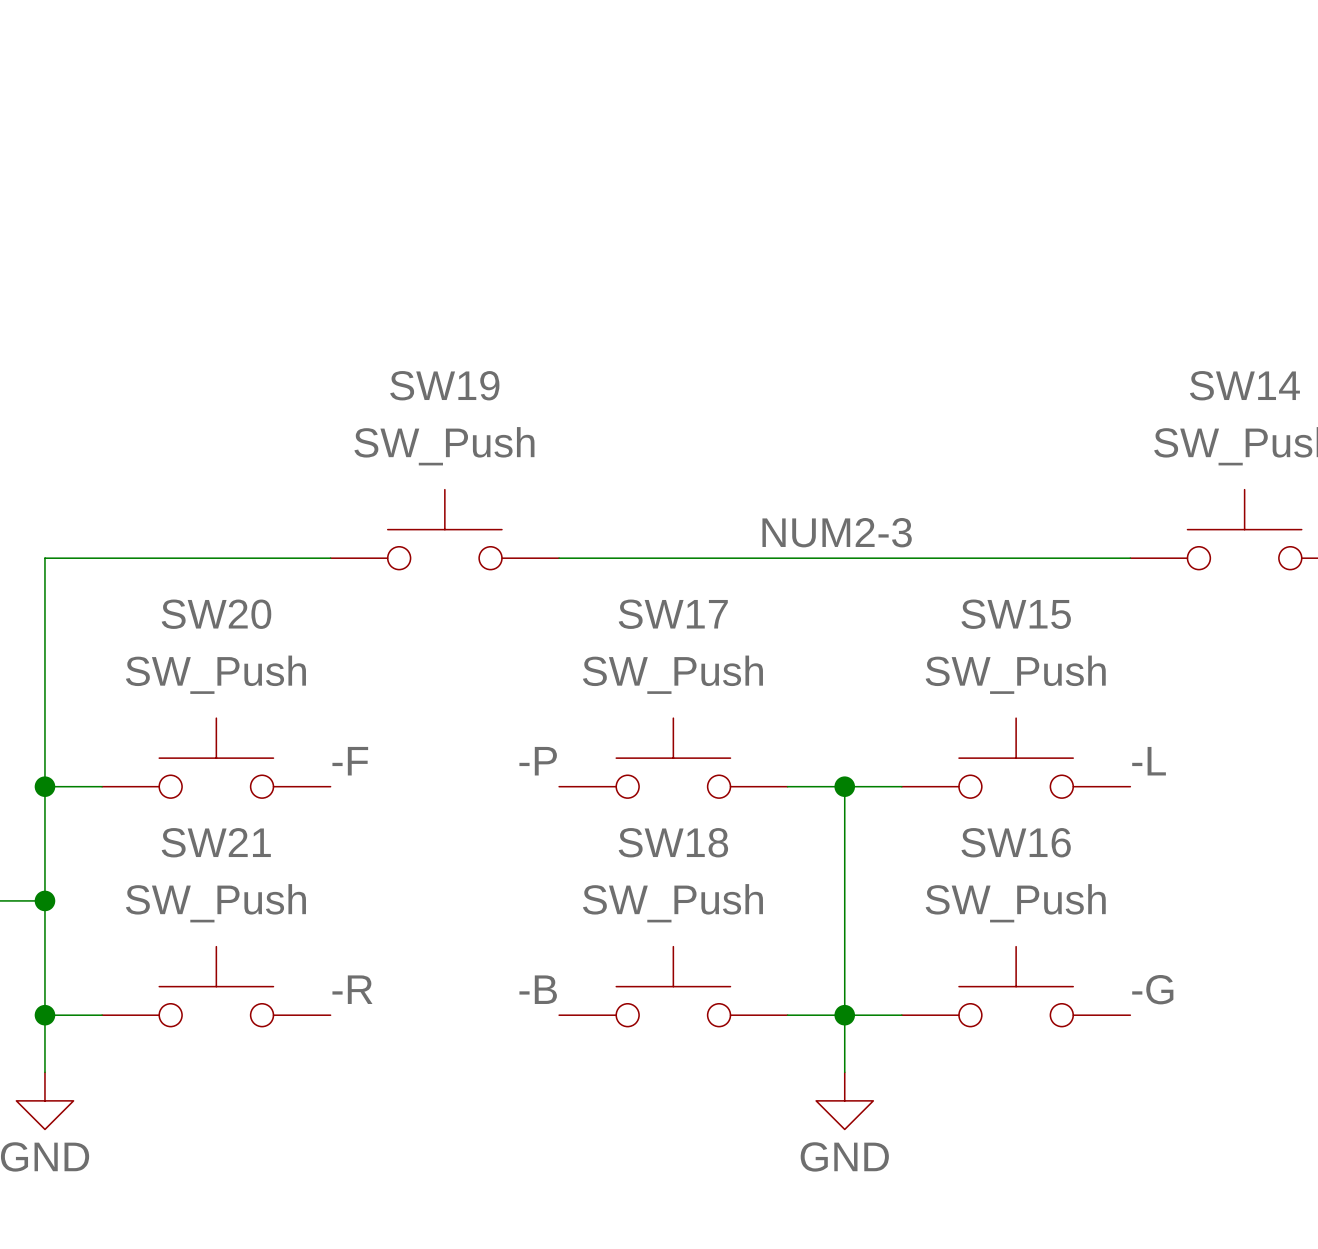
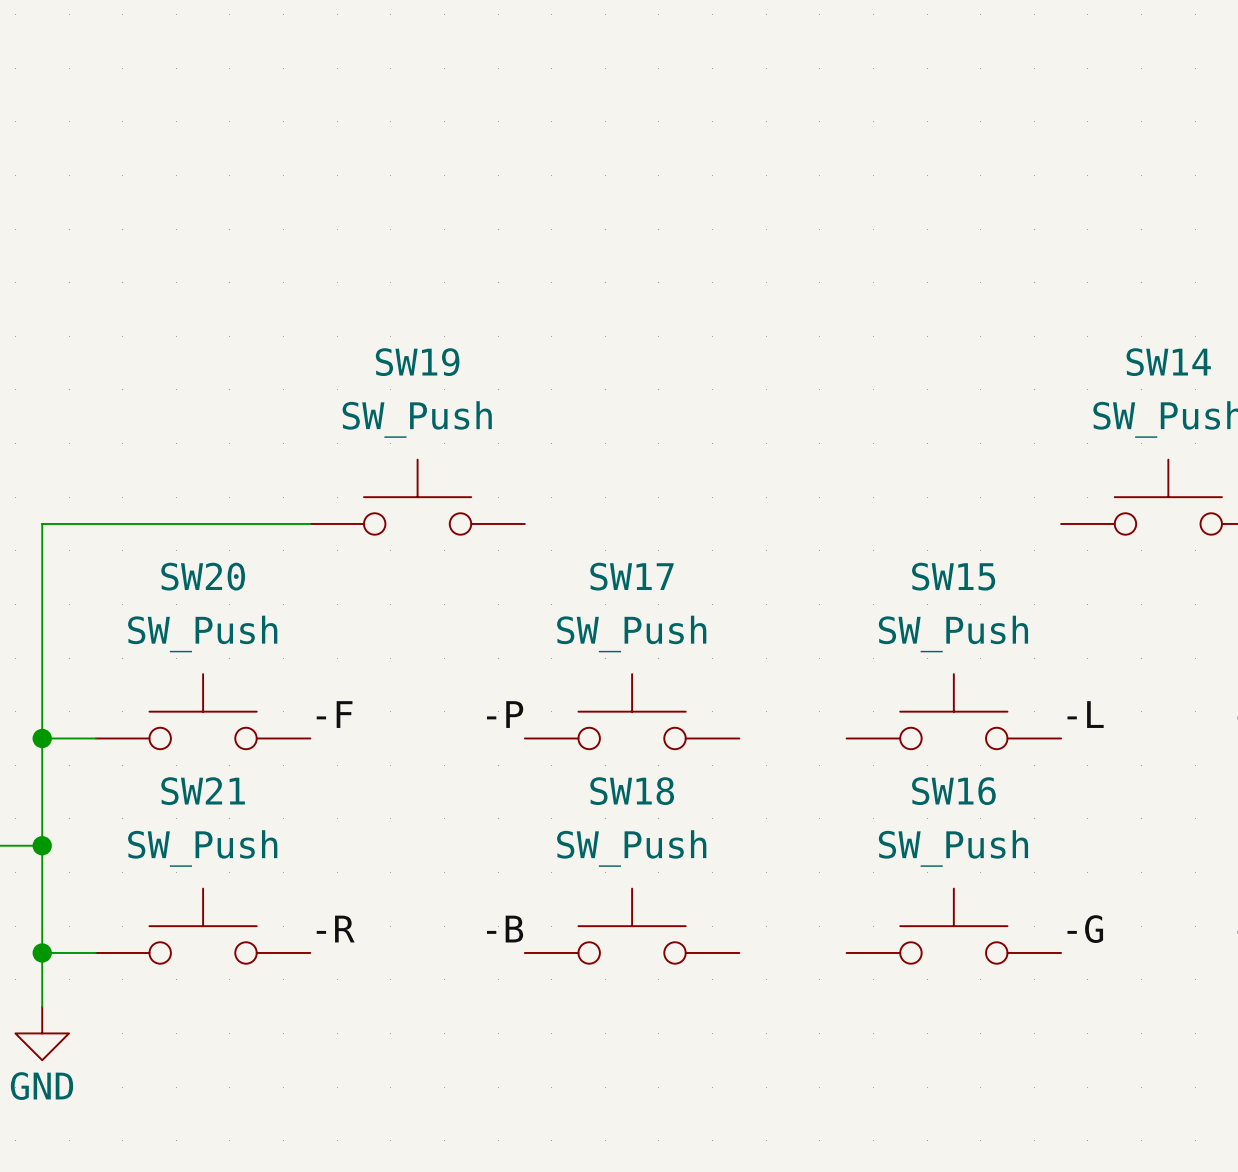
label: NUM2-3 (837, 532) -> none
wire: (559, 558) (1130, 558) -> none
wire: (787, 786) (901, 786) -> none
wire: (844, 786) (844, 1072) -> none
junction: (844, 786) -> none
wire: (787, 1015) (901, 1015) -> none
junction: (844, 1015) -> none
power symbol: GND (844, 1100) -> none

